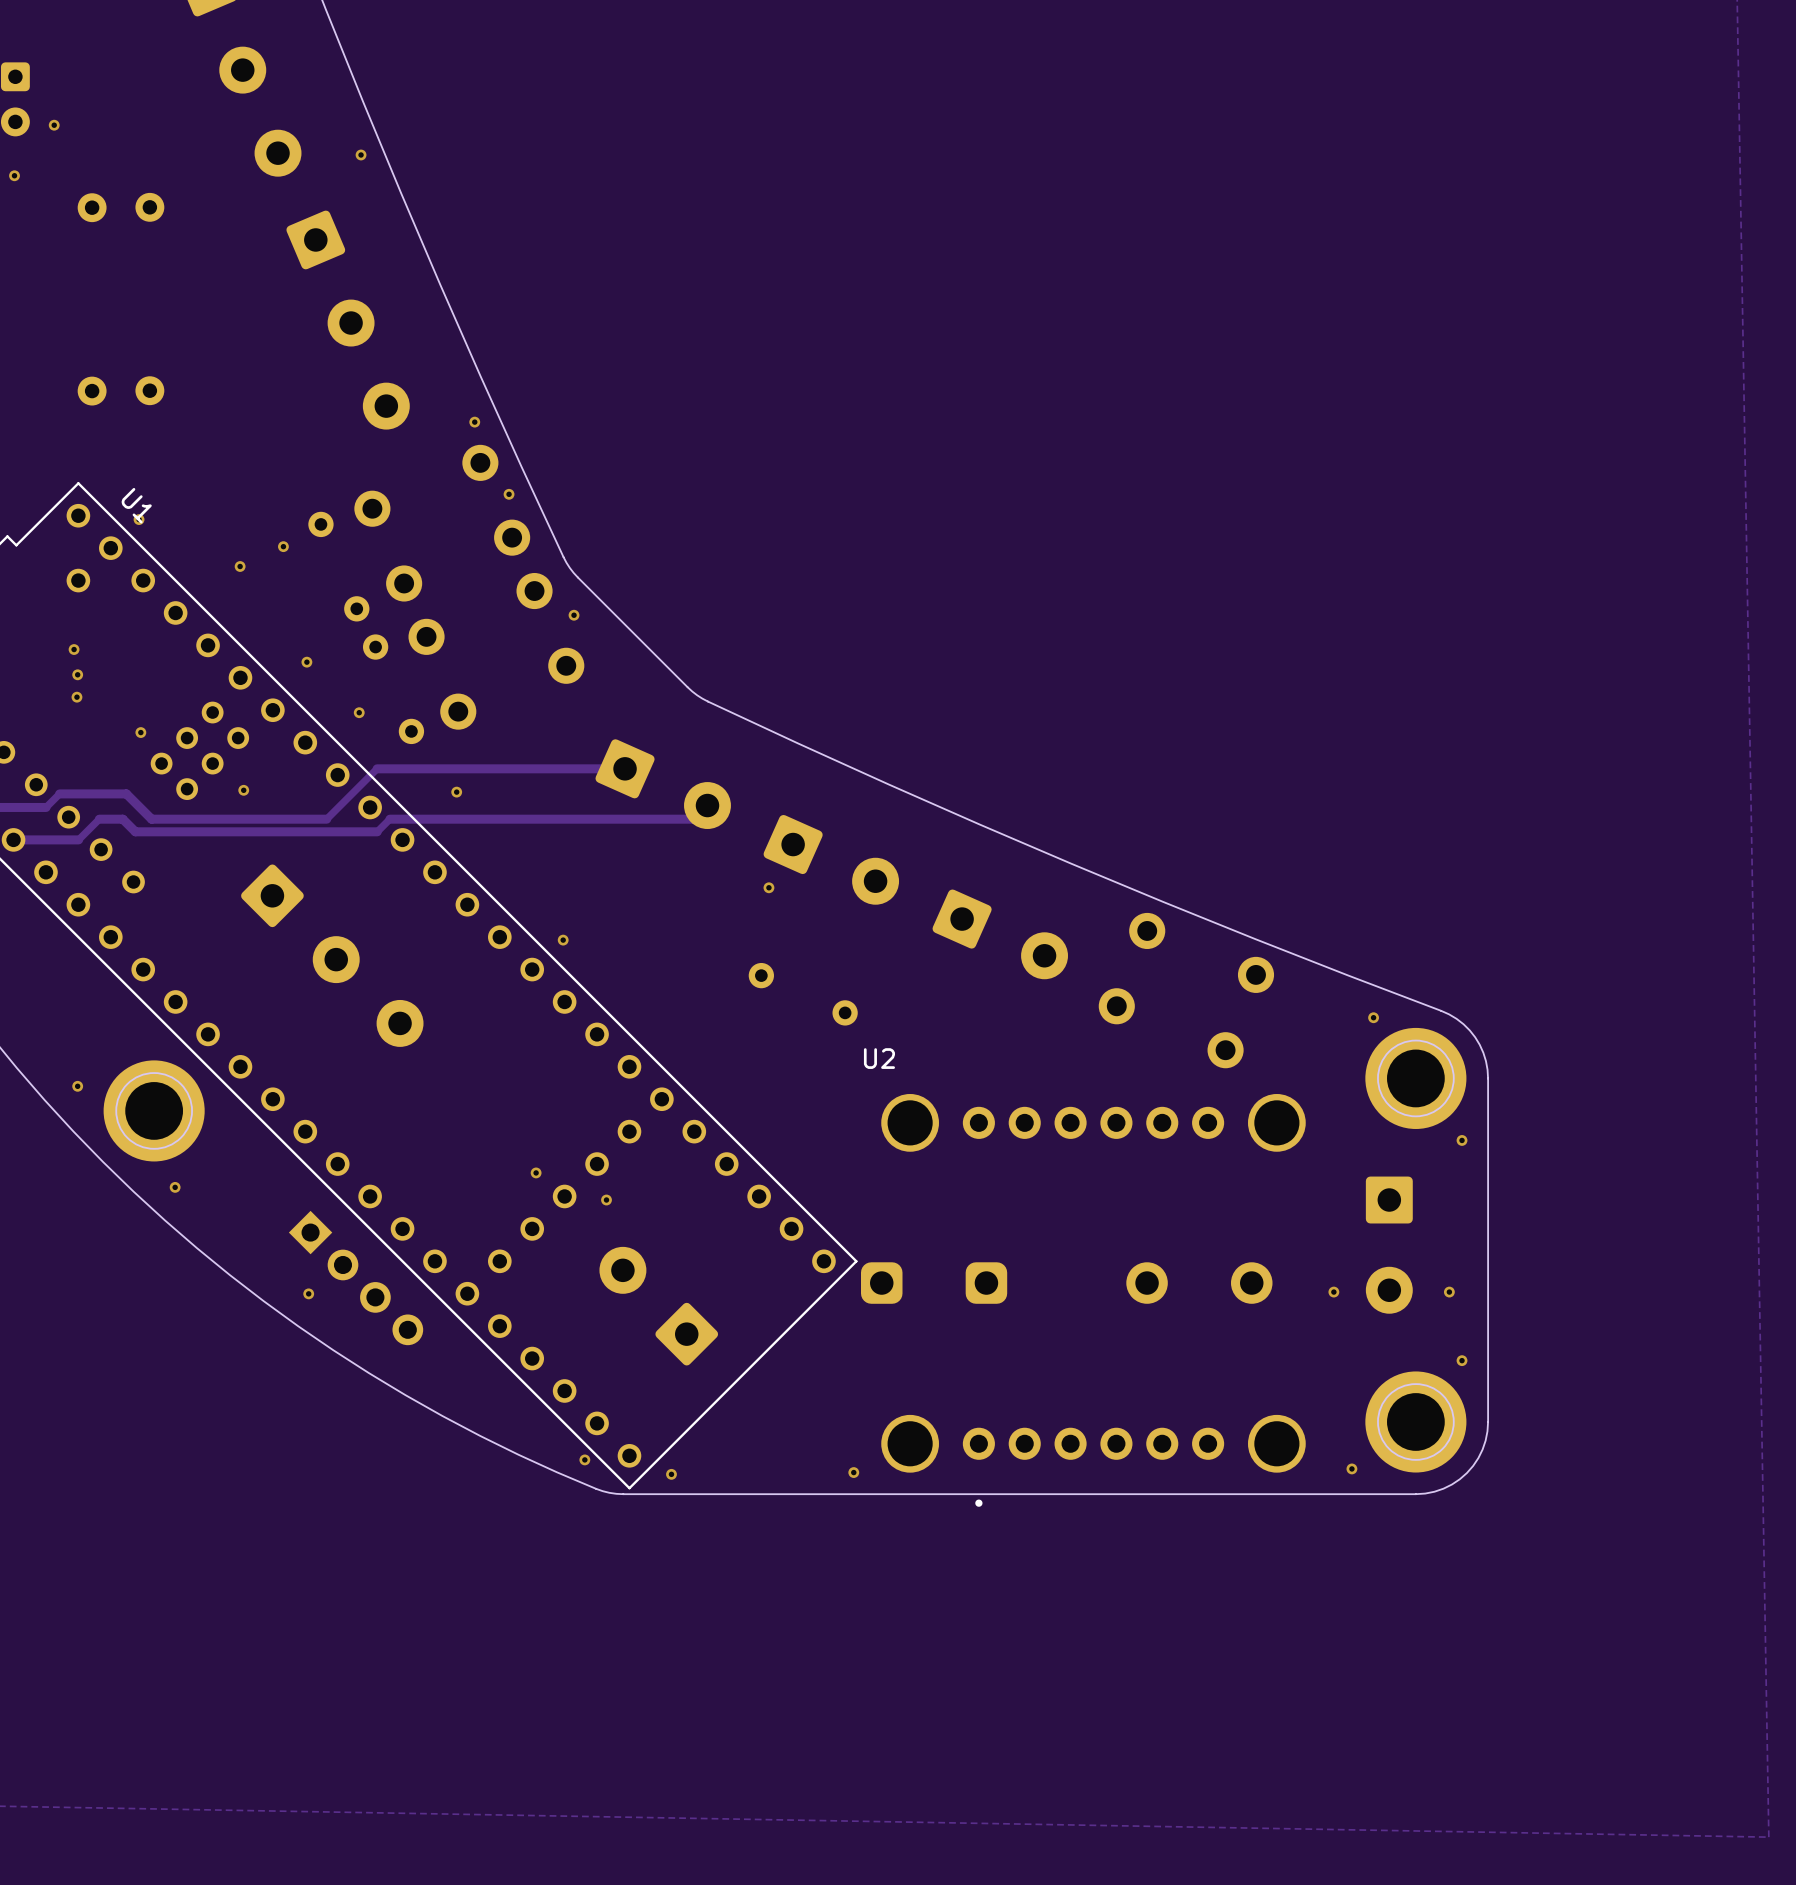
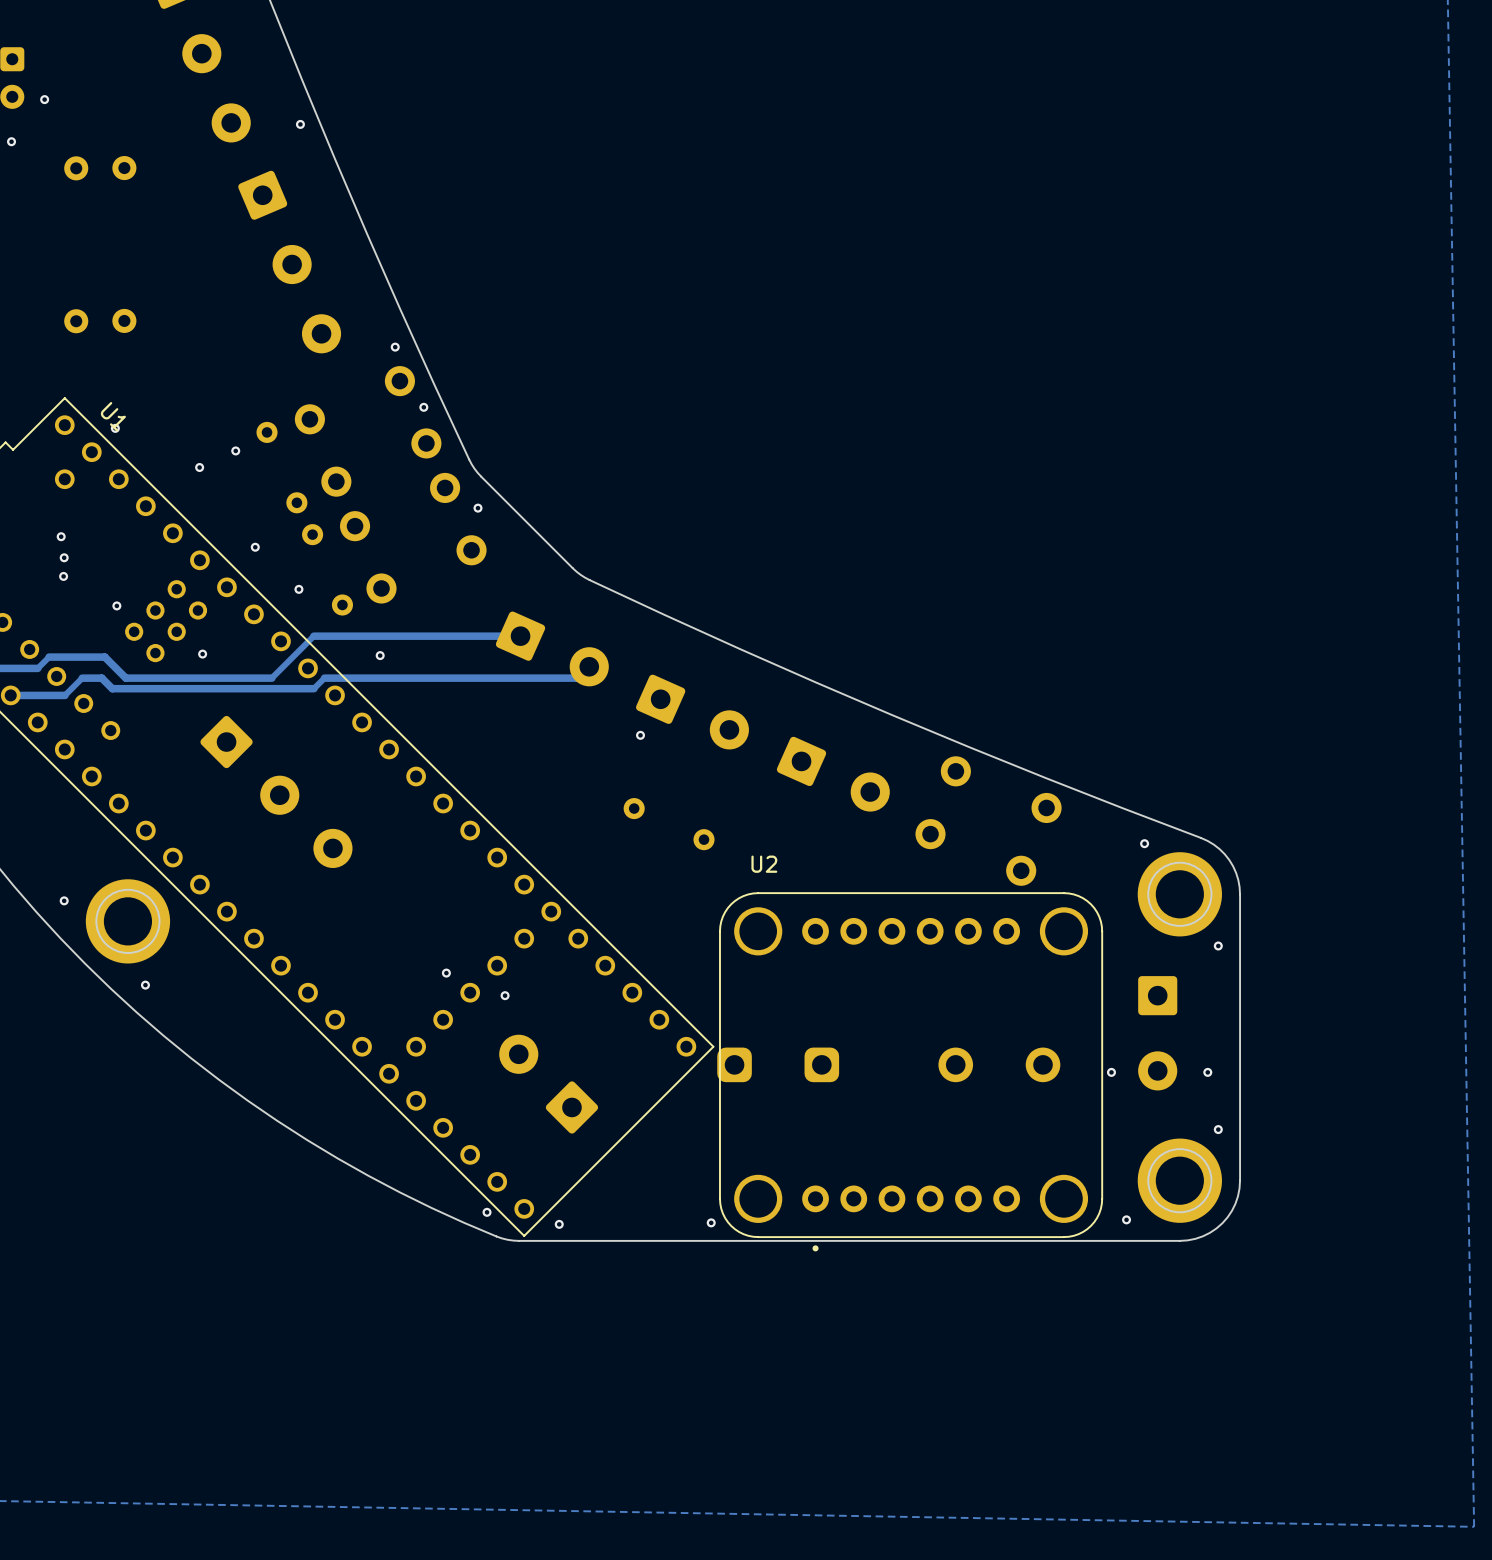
via: (563, 940) -> none
U2 name position: U2 (879, 1058) -> U2 (764, 864)
U2 footprint: [881, 1093, 1306, 1507] -> [719, 892, 1104, 1252]
part: (356, 1278) -> none
via: (308, 1293) -> none

